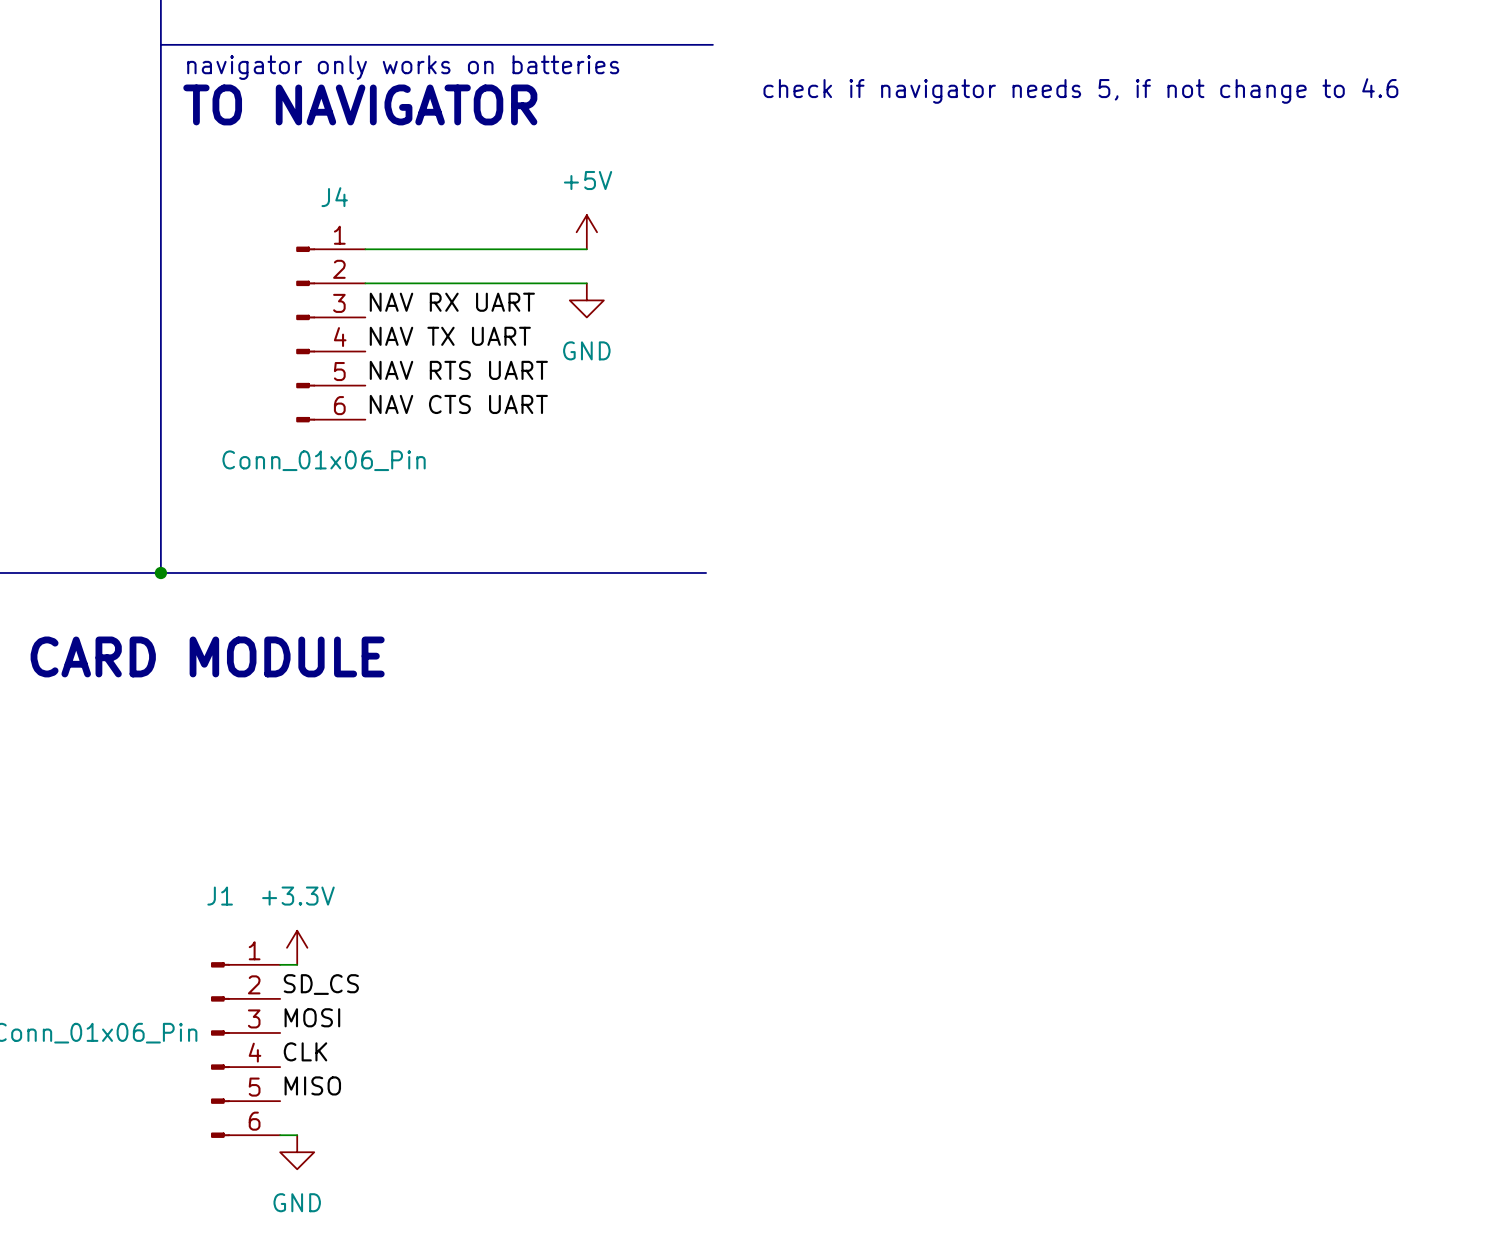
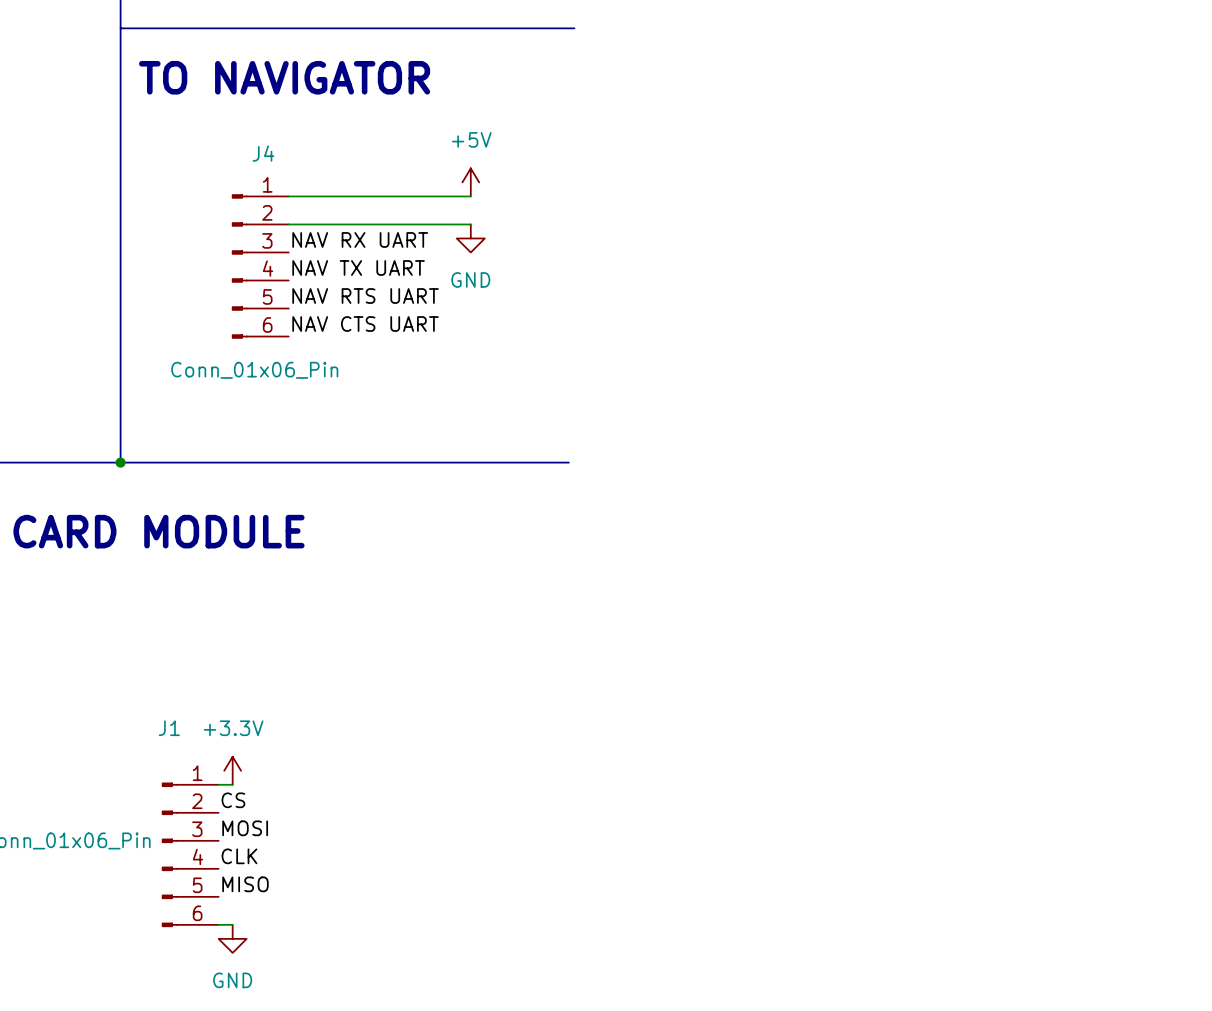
text: navigator only works on batteries (403, 67) -> none
text: check if navigator needs 5, if not change to 4.6 (1080, 90) -> none
label: SD_CS (321, 984) -> CS (233, 800)

